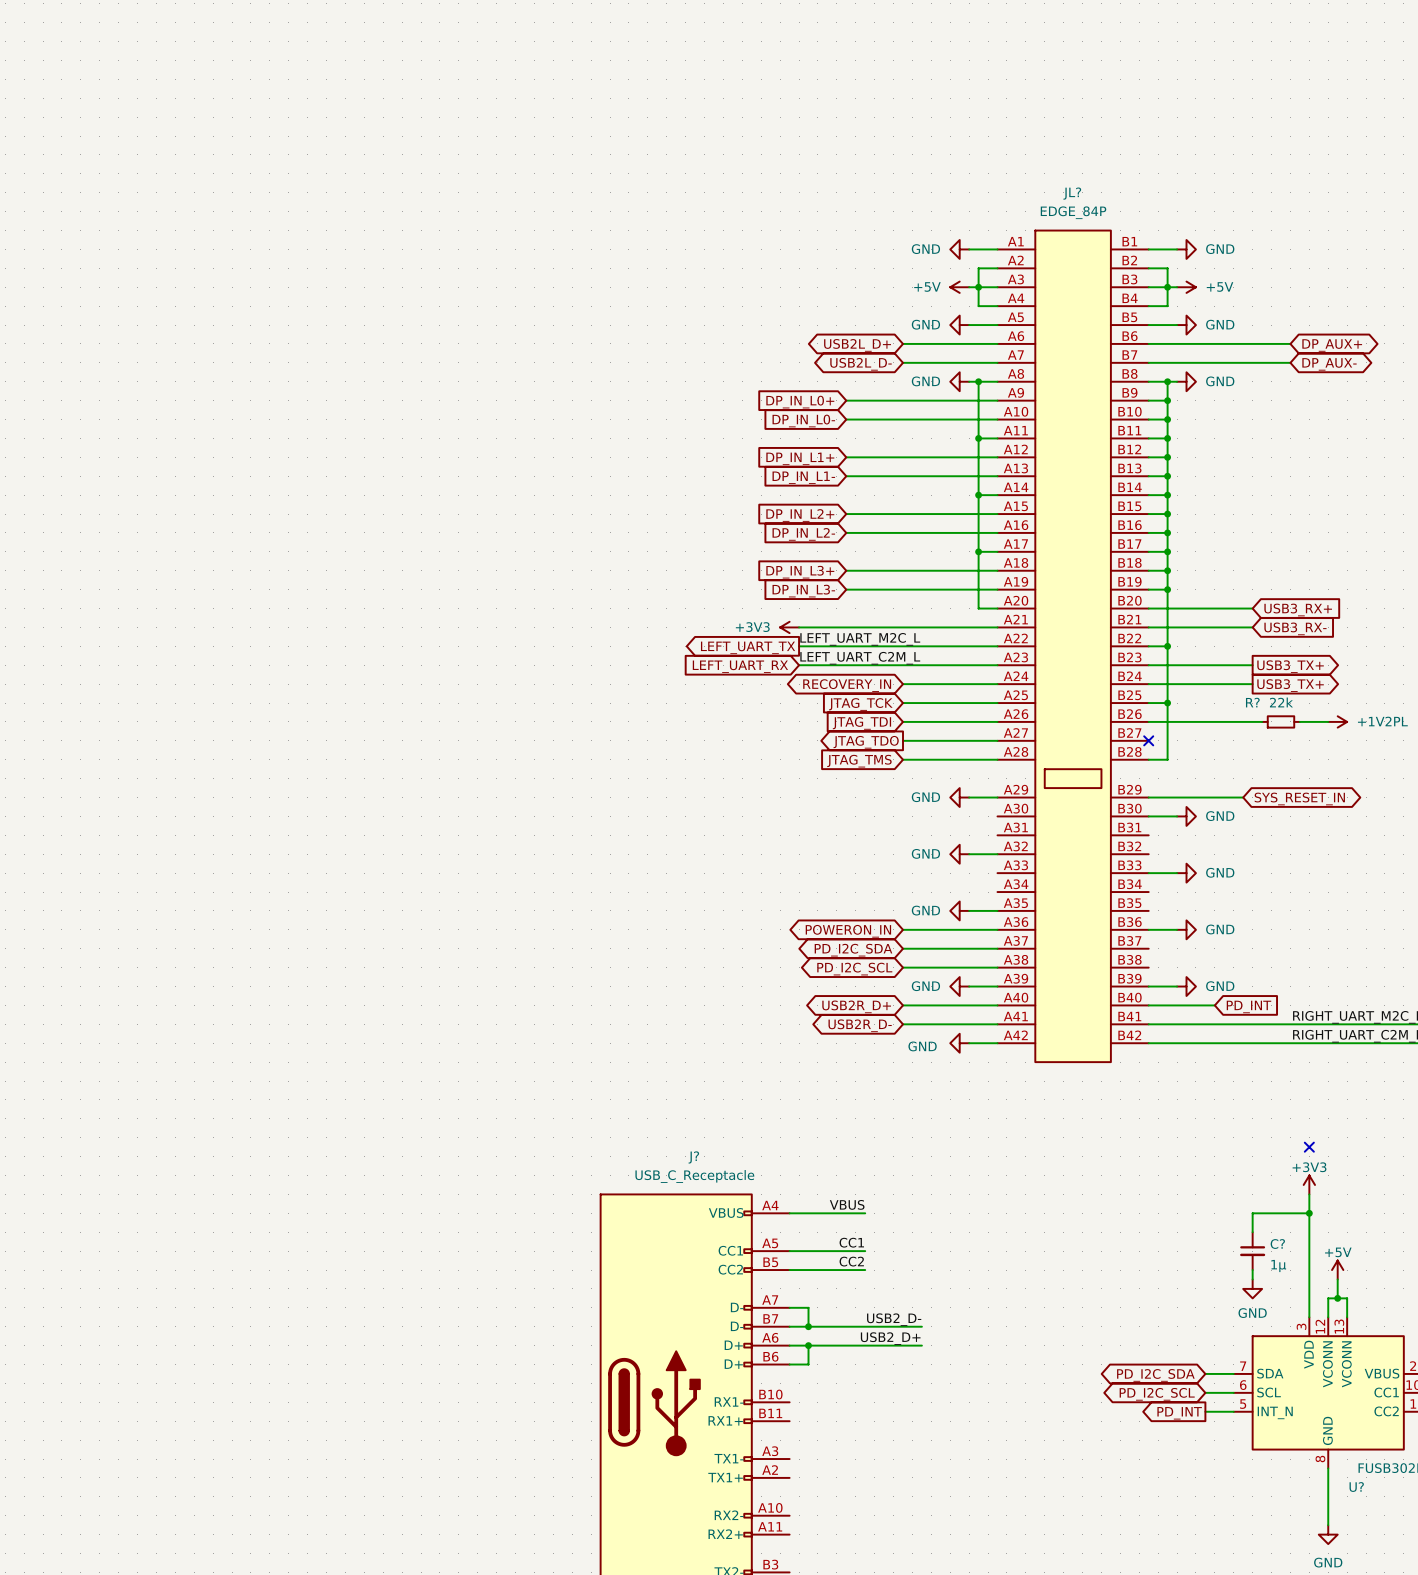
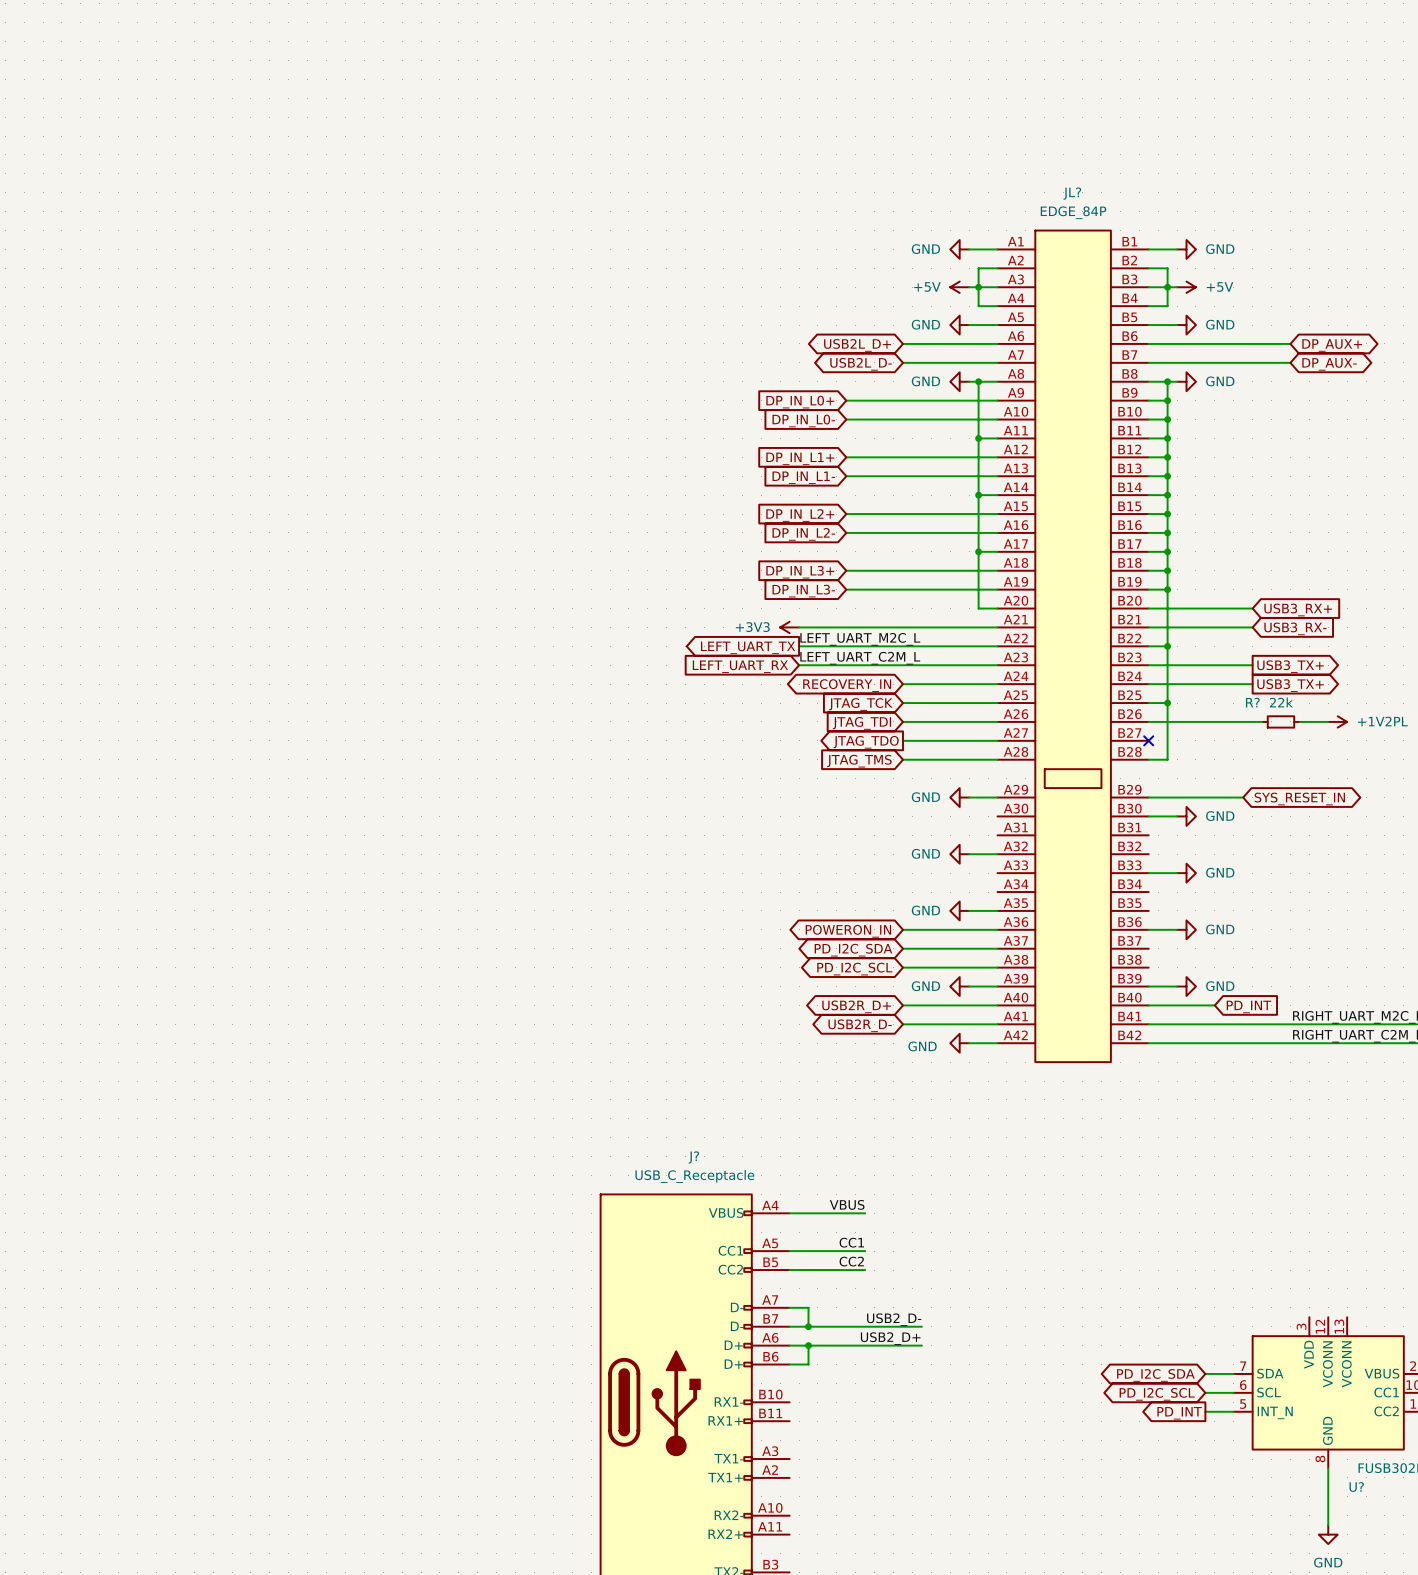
no-connect mark: (1309, 1147) -> none
power symbol: +3V3 (1309, 1184) -> none
wire: (1309, 1194) (1309, 1317) -> none
wire: (1309, 1213) (1252, 1213) (1252, 1232) -> none
junction: (1309, 1213) -> none
C?: 1µ (1252, 1251) -> none
wire: (1252, 1270) (1252, 1279) -> none
power symbol: +5V (1337, 1270) -> none
wire: (1337, 1279) (1337, 1298) -> none
power symbol: GND (1252, 1288) -> none
junction: (1337, 1298) -> none
wire: (1328, 1317) (1328, 1298) (1347, 1298) (1347, 1317) -> none

